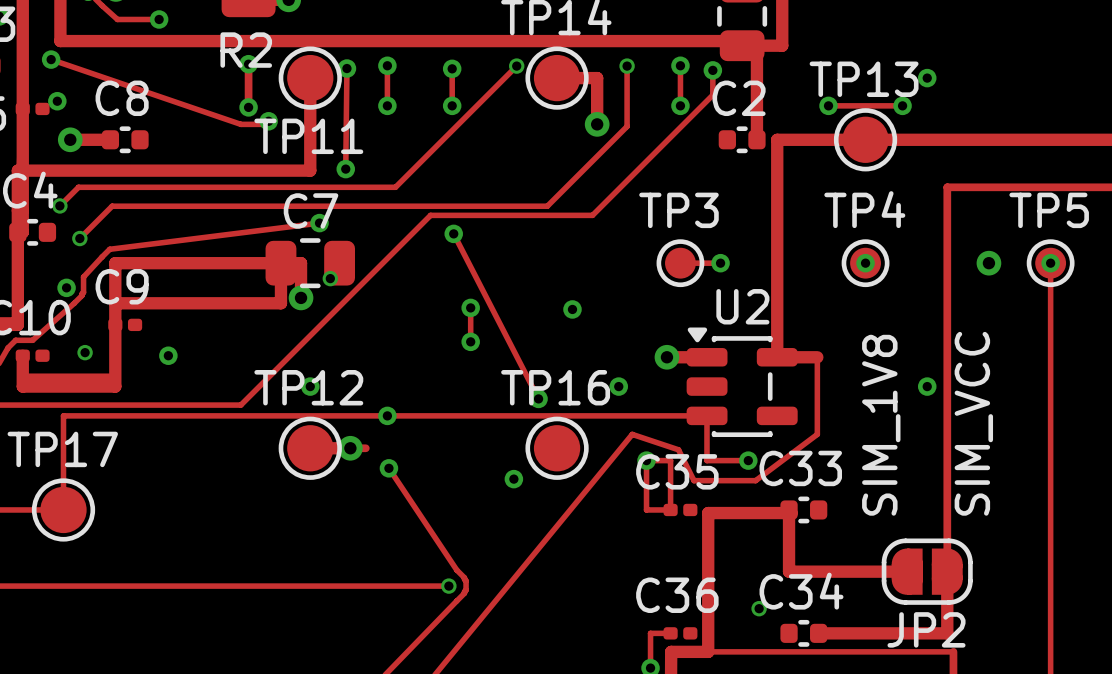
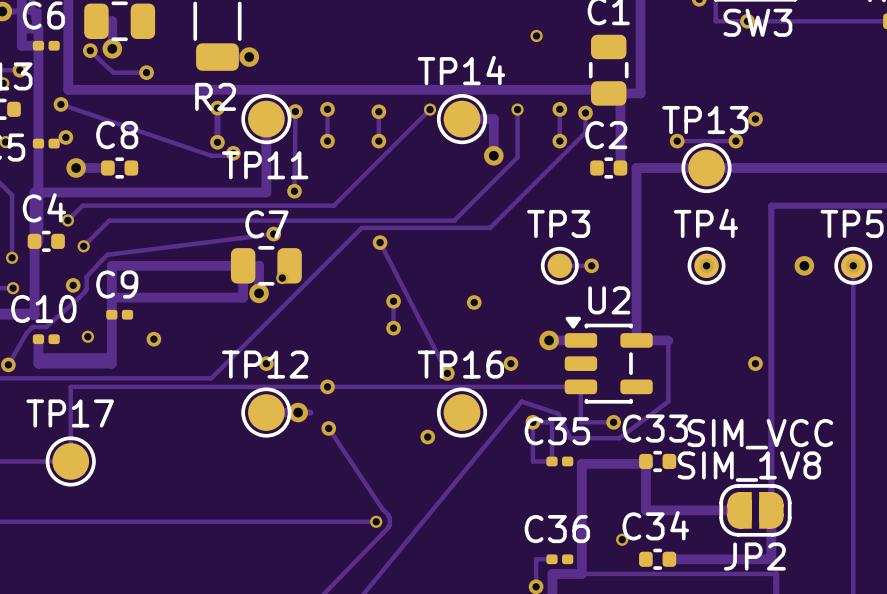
text rotation: 0° (973, 423) -> 90° clockwise (760, 434)
text rotation: 0° (881, 425) -> 90° clockwise (749, 466)

